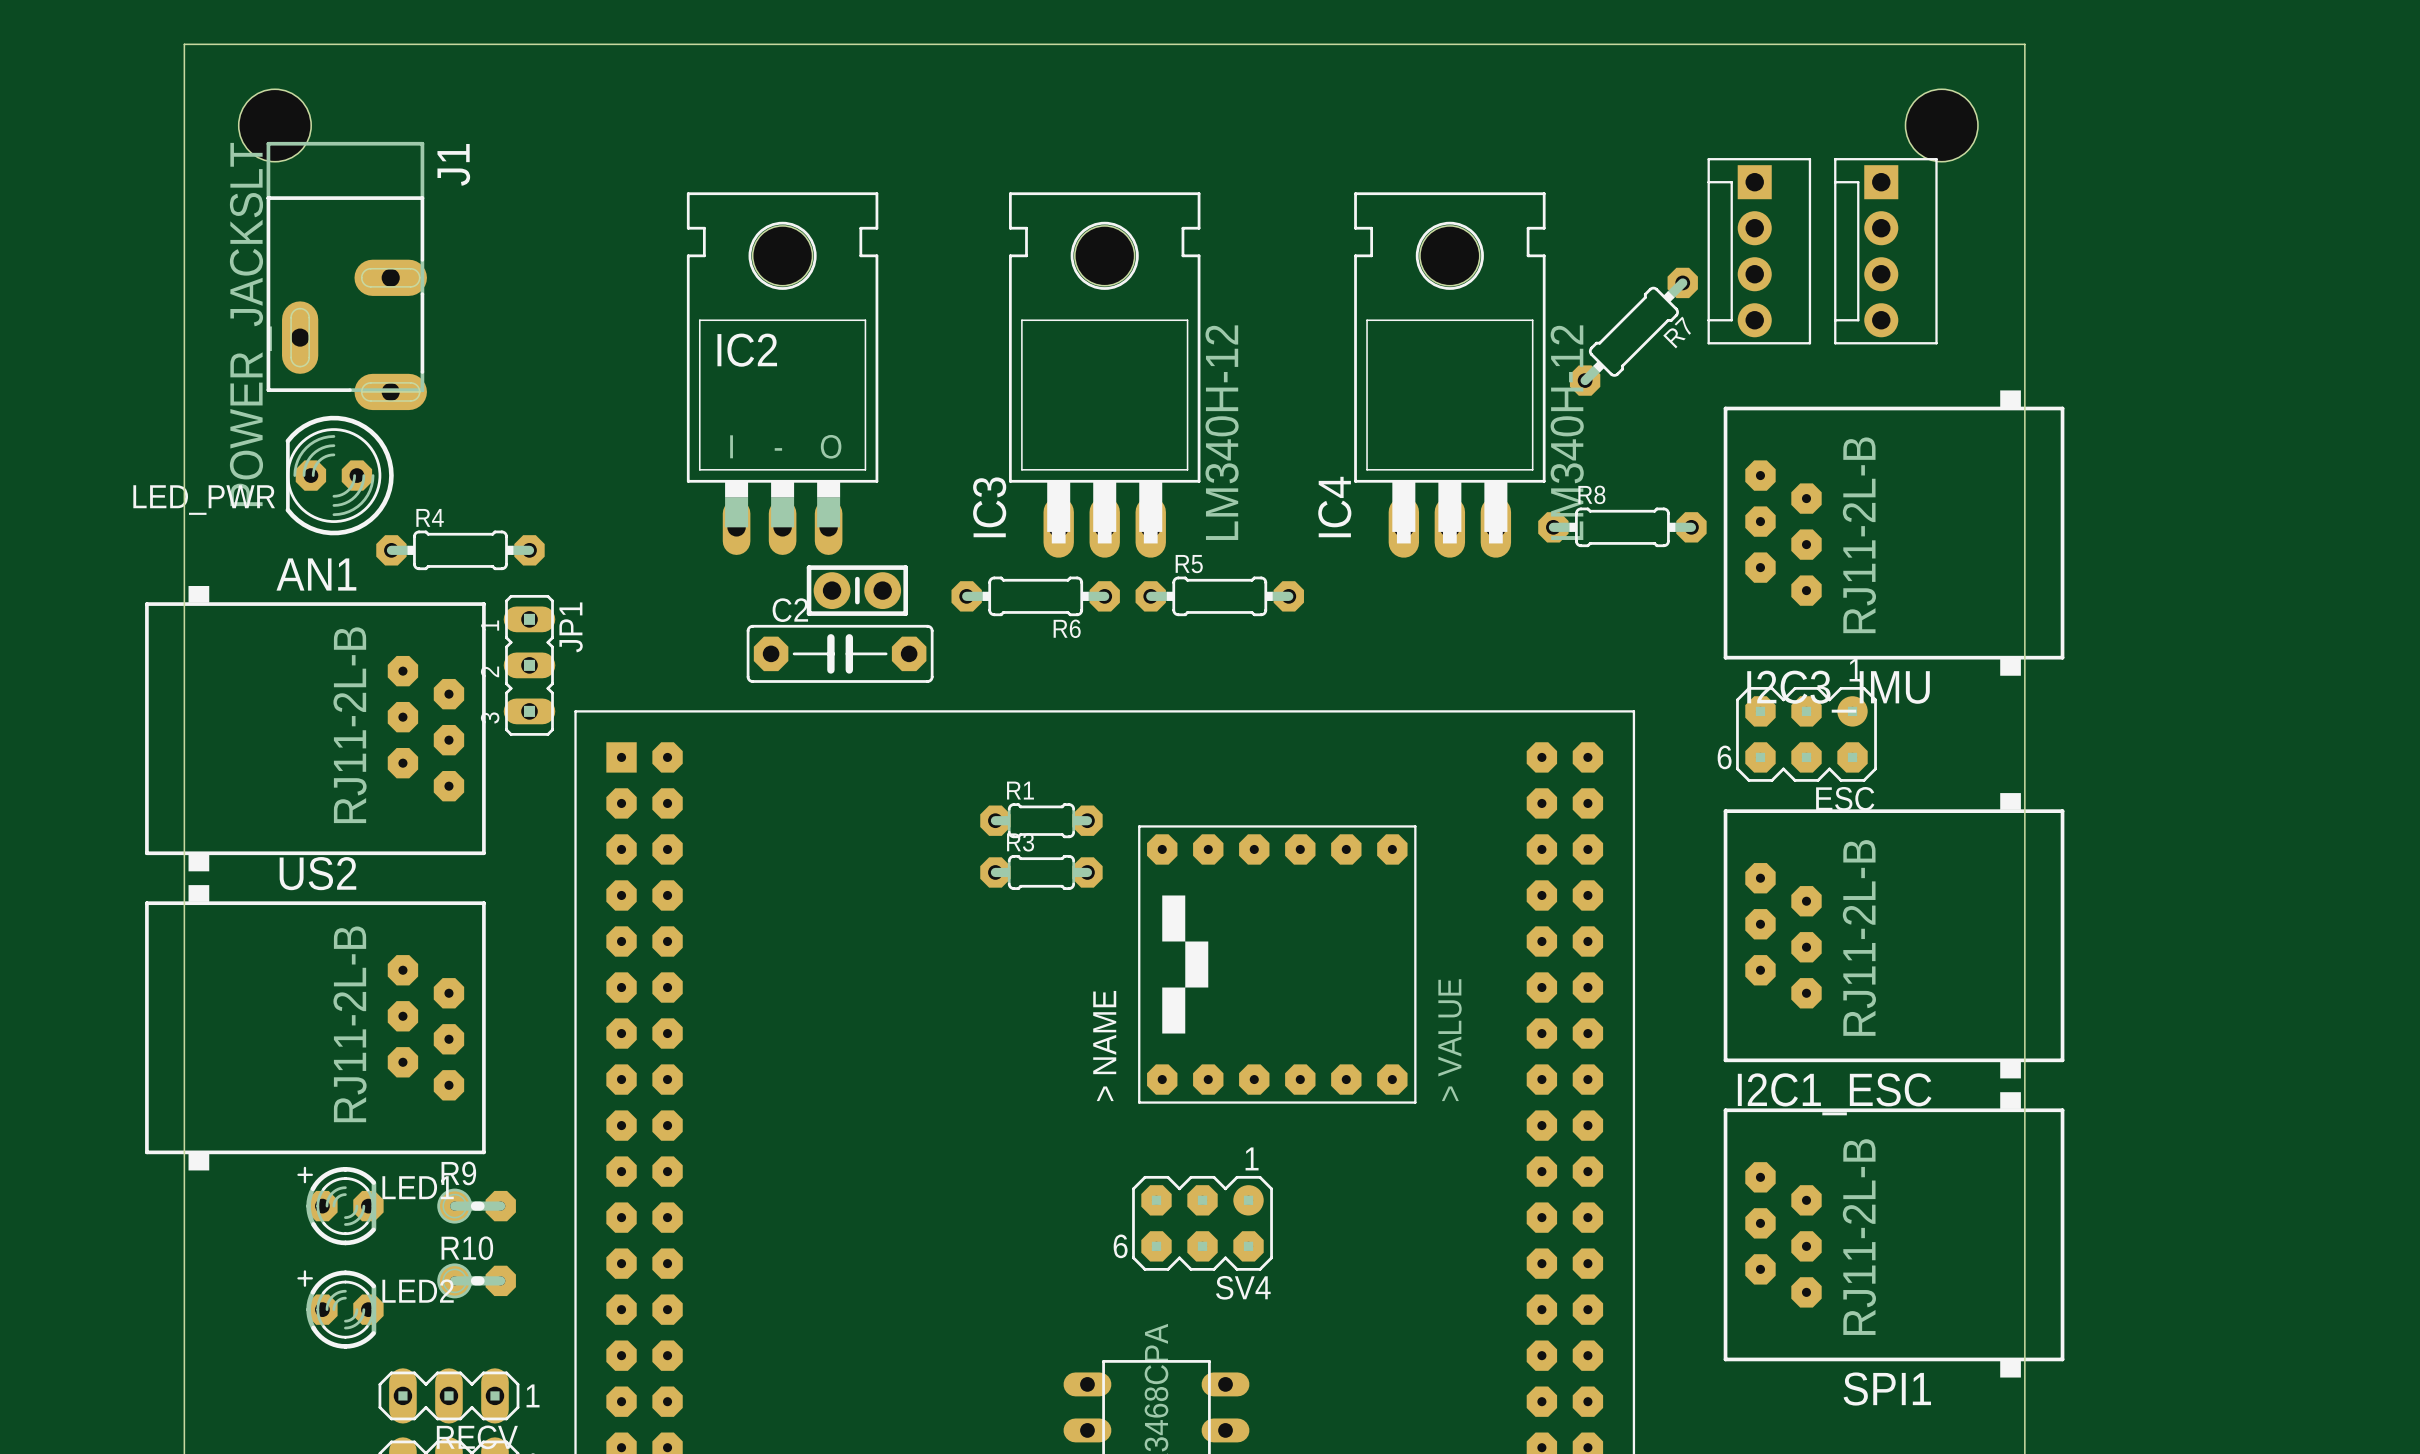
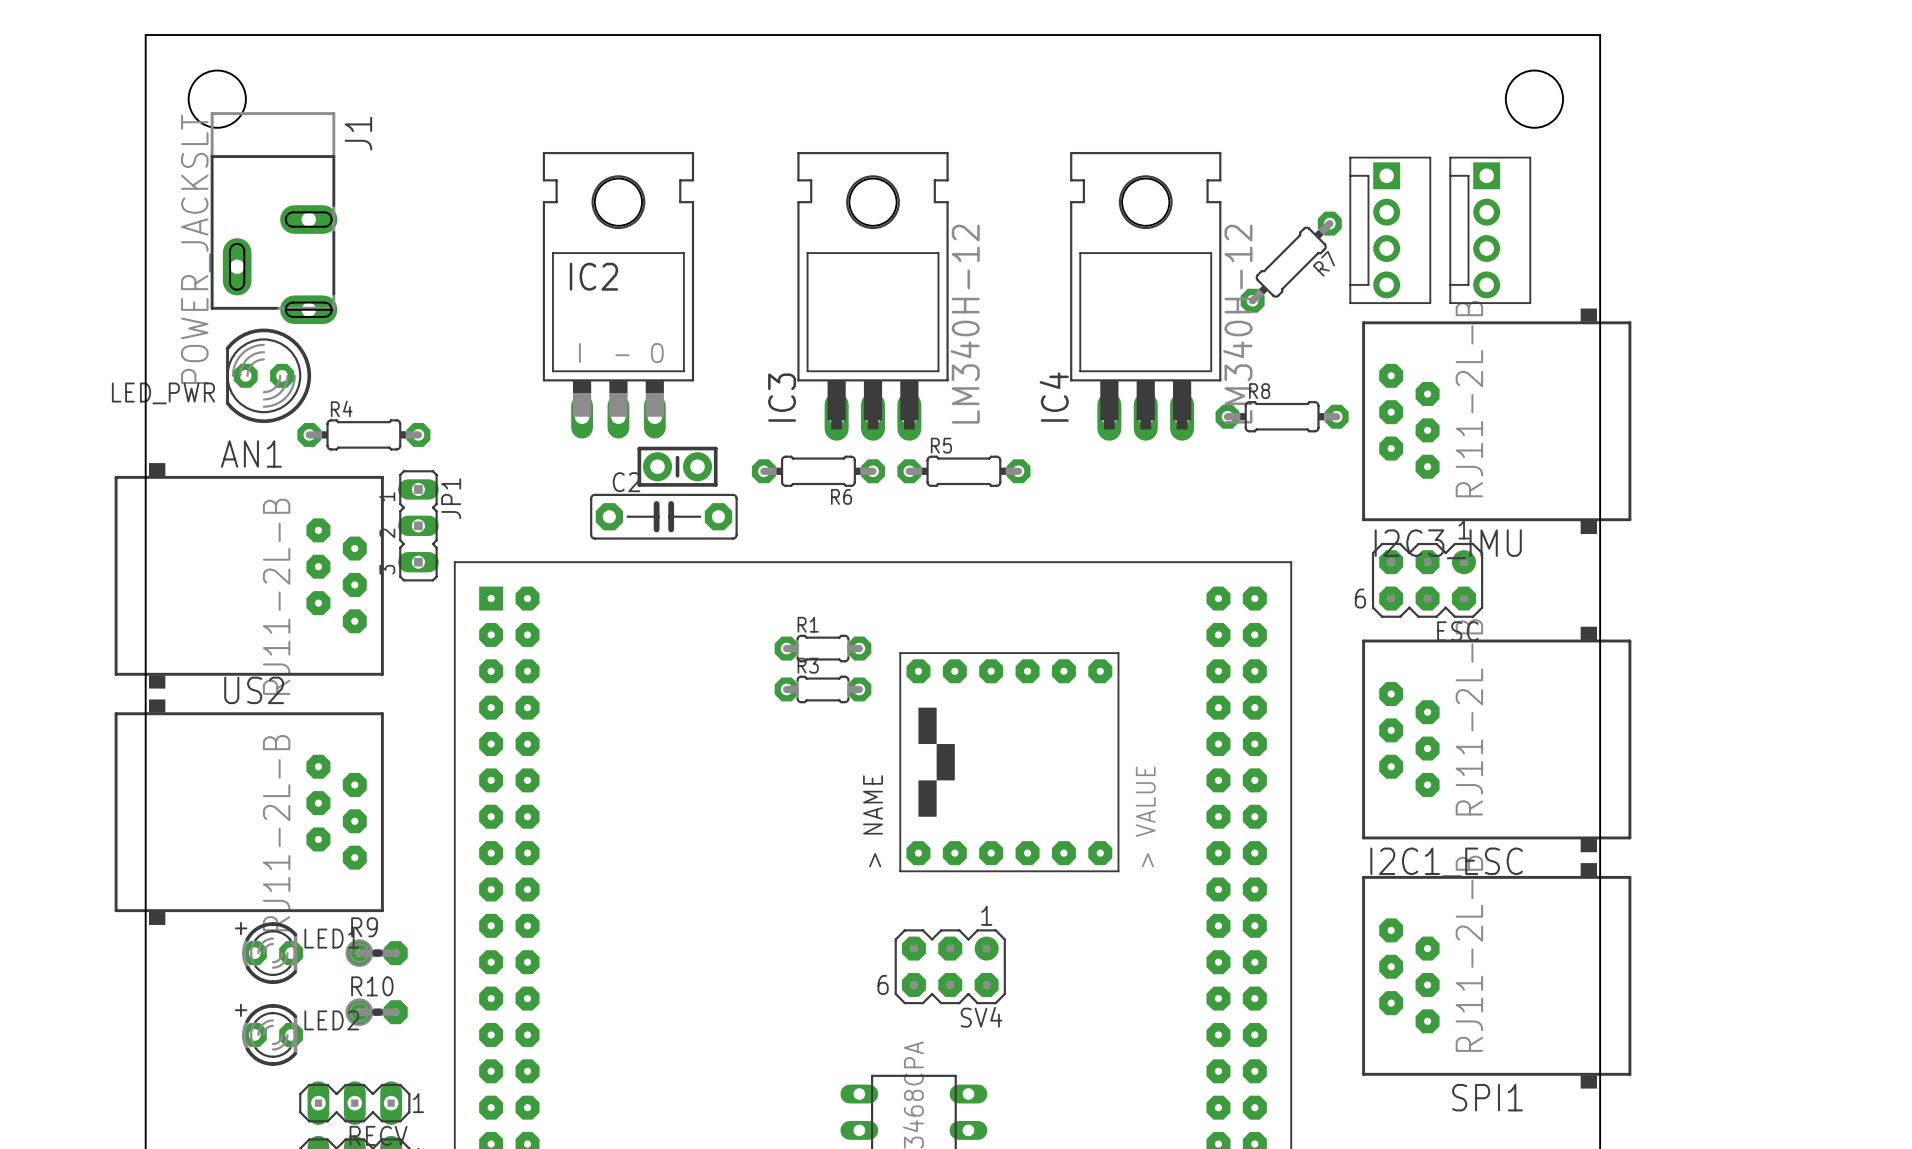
part position: (1759, 251) -> (1390, 230)
part position: (1885, 251) -> (1490, 230)

